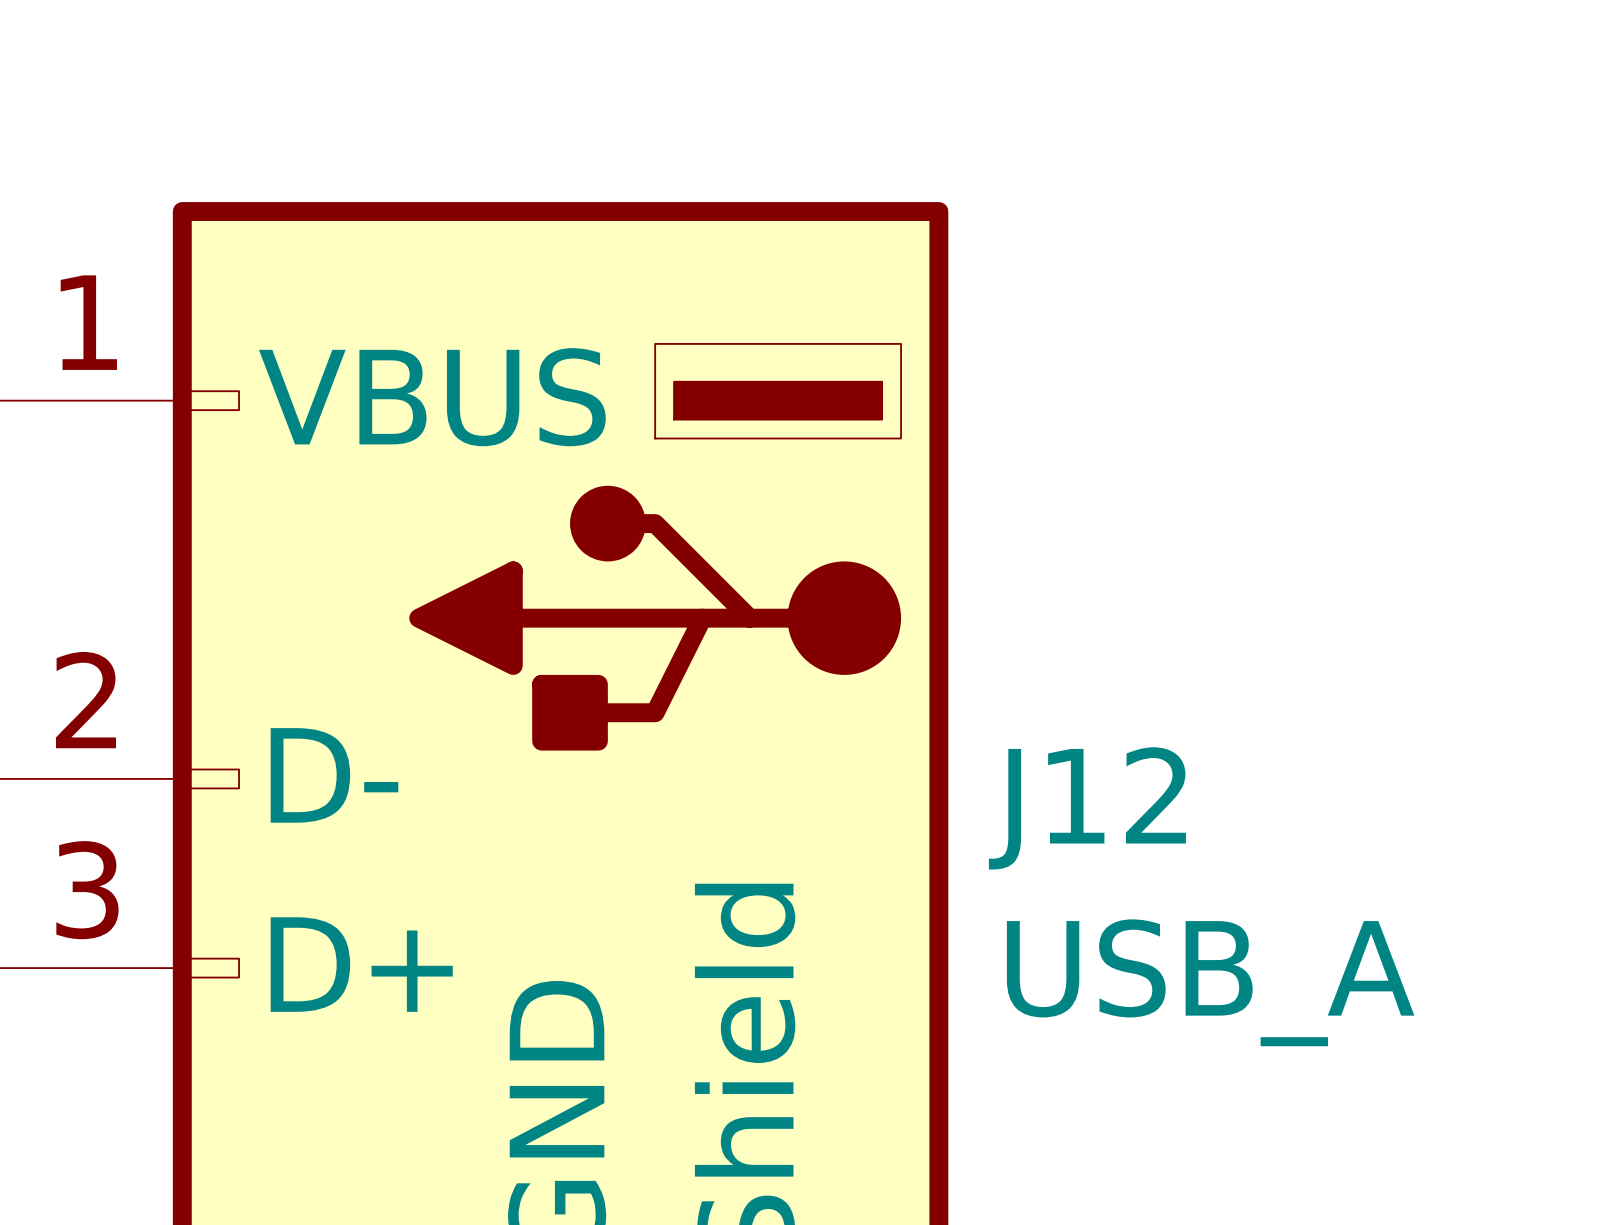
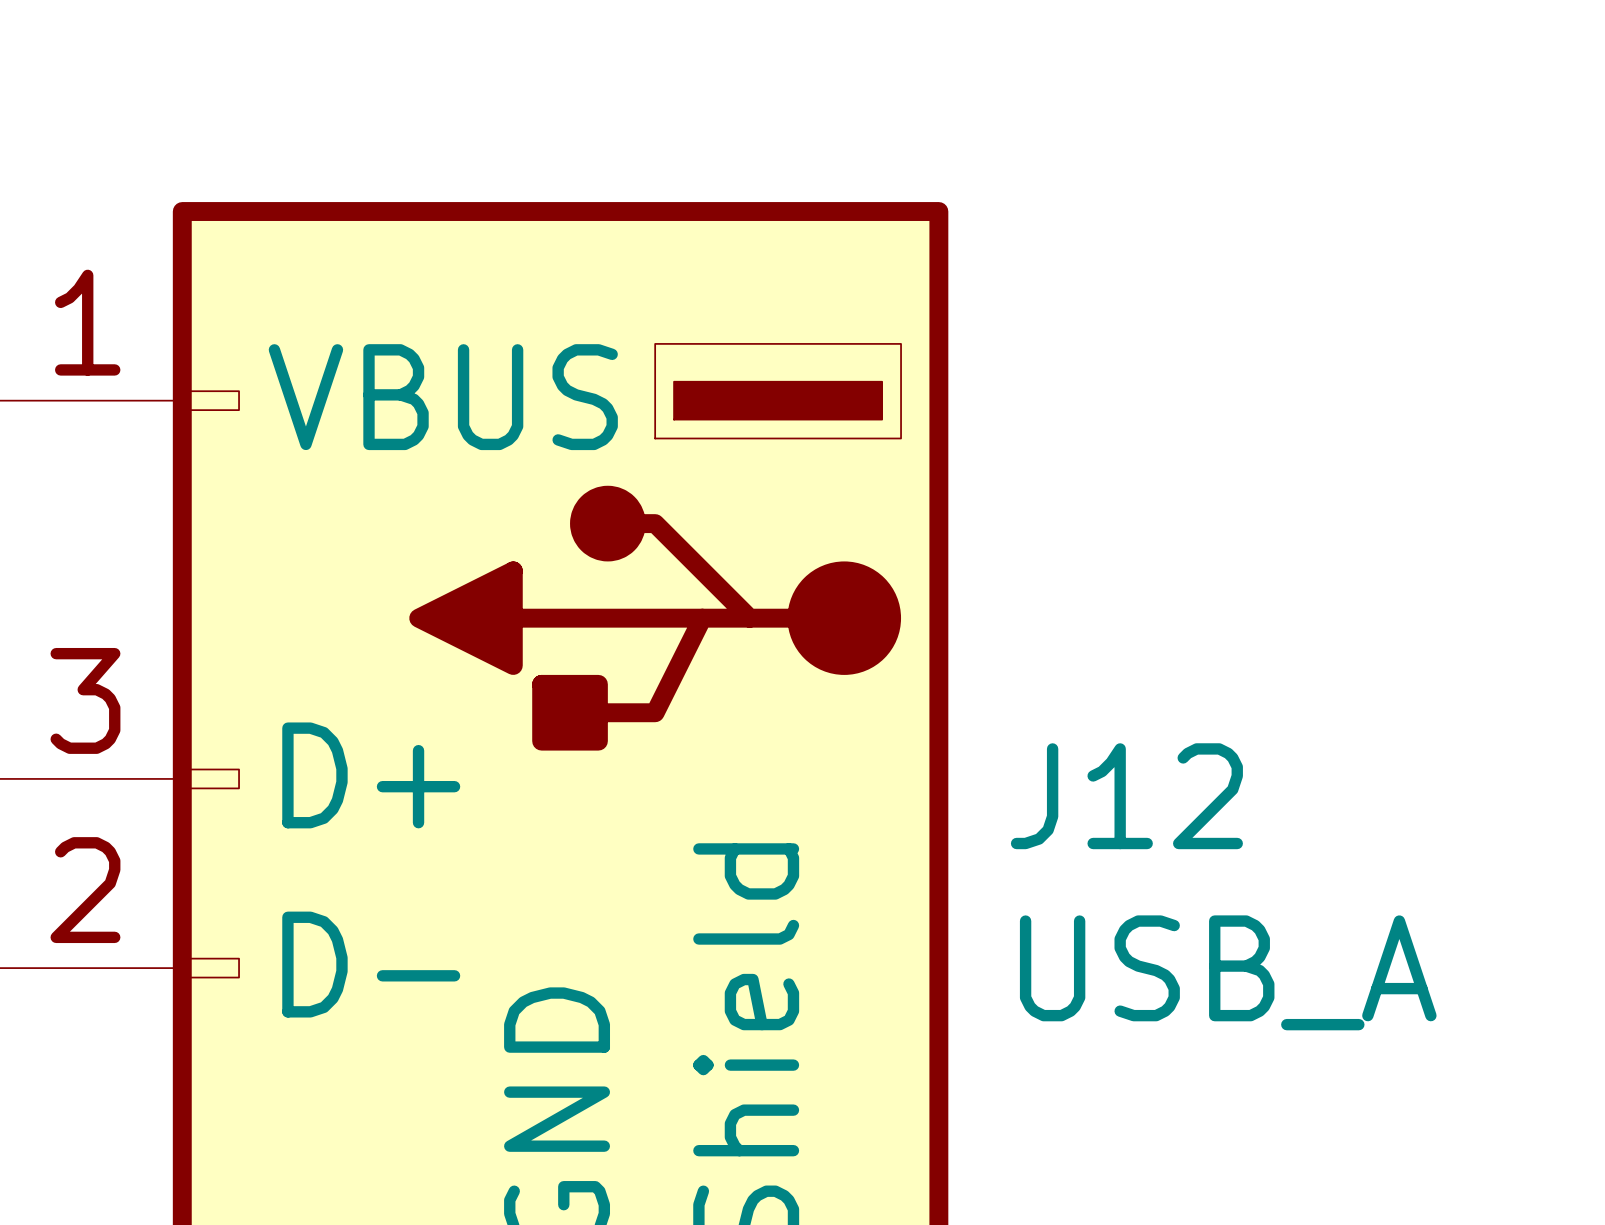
J12 pin number: 2 (85, 700) -> 3 (85, 700)
J12 pin name: D- (334, 775) -> D+ (371, 775)
J12 pin number: 3 (87, 890) -> 2 (85, 890)
J12 pin name: D+ (361, 964) -> D- (371, 964)

